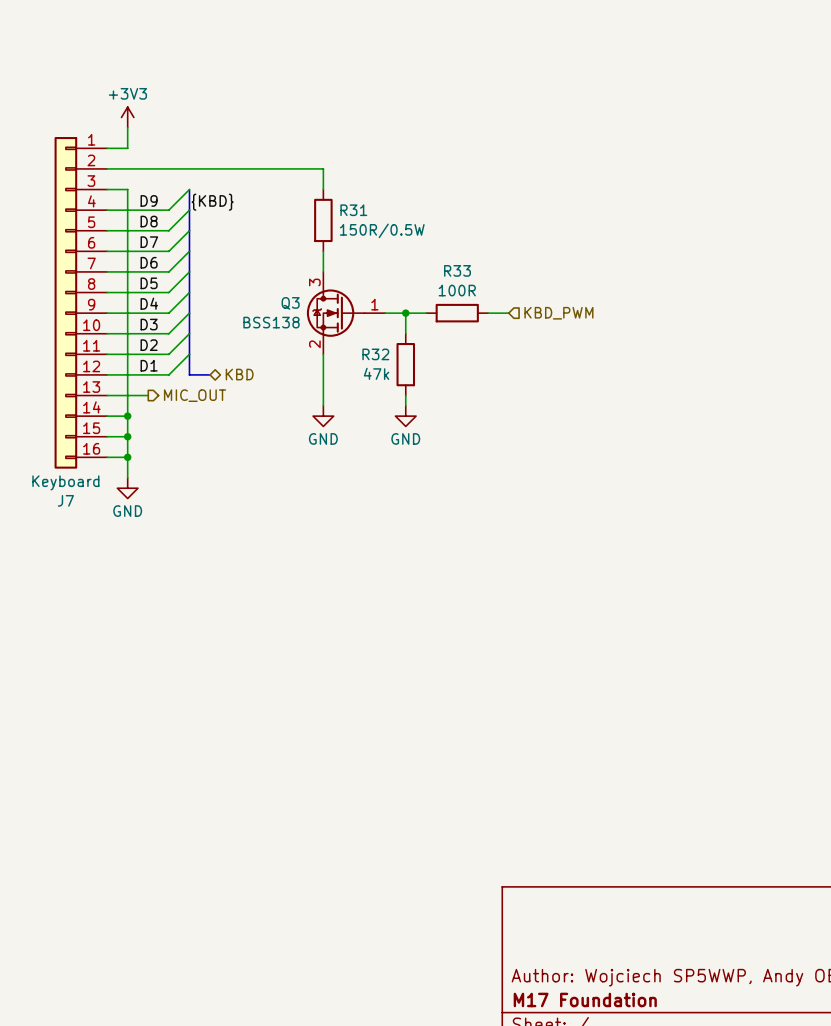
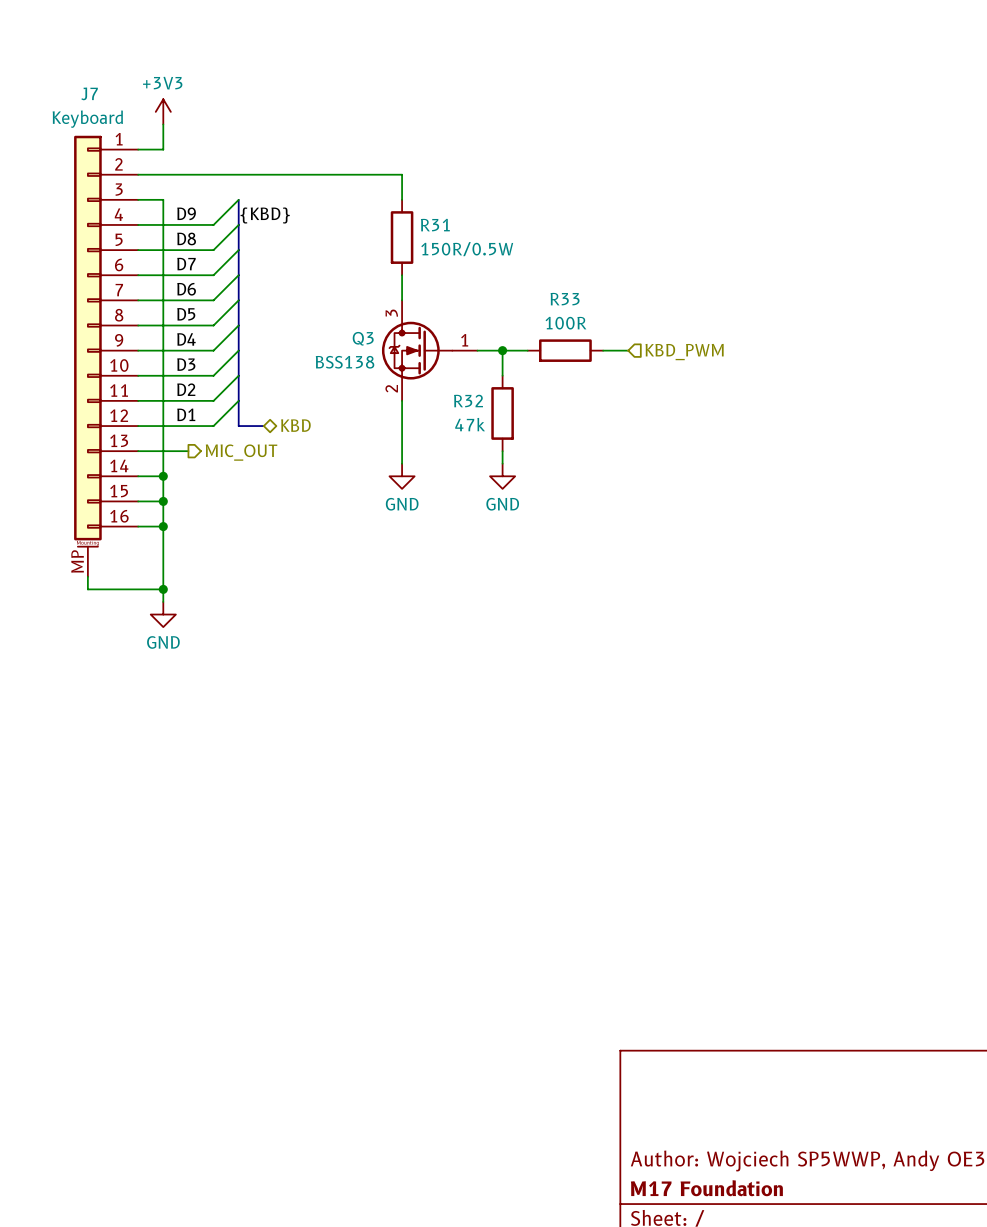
J7 symbol: [54, 137, 108, 469] -> [74, 135, 139, 577]
wire: none -> (163, 551) (163, 601)
J7 value position: Keyboard (65, 482) -> Keyboard (87, 119)
power symbol position: GND (127, 488) -> GND (163, 614)
wire: none -> (87, 576) (87, 589) (163, 589)
J7 name position: J7 (65, 500) -> J7 (89, 93)
junction: none -> (163, 589)

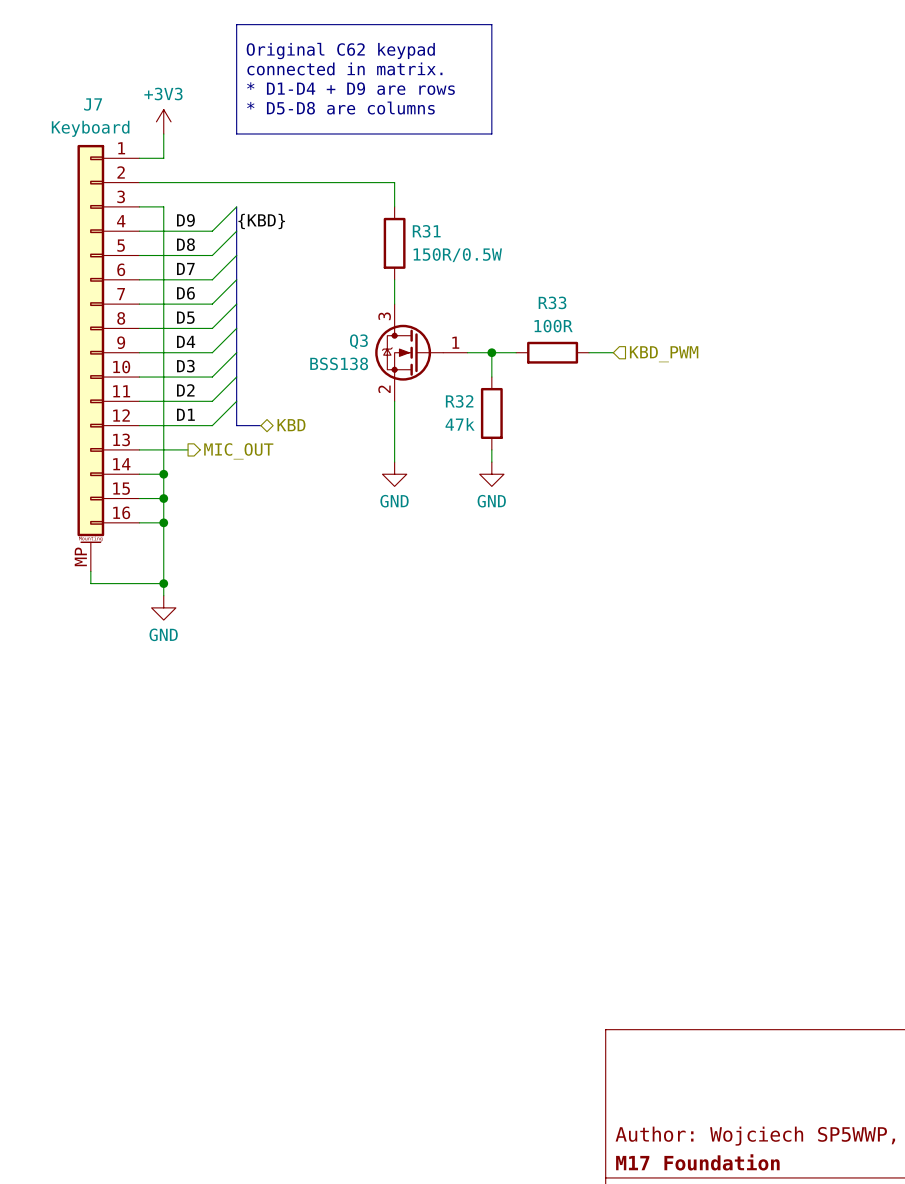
line: none -> (236, 24) (491, 24) (491, 133) (236, 133) (236, 24)
text: none -> Original C62 keypad (340, 51)
text: none -> connected in matrix. (344, 68)
text: none -> * D1-D4 + D9 are rows (350, 88)
text: none -> * D5-D8 are columns (340, 108)

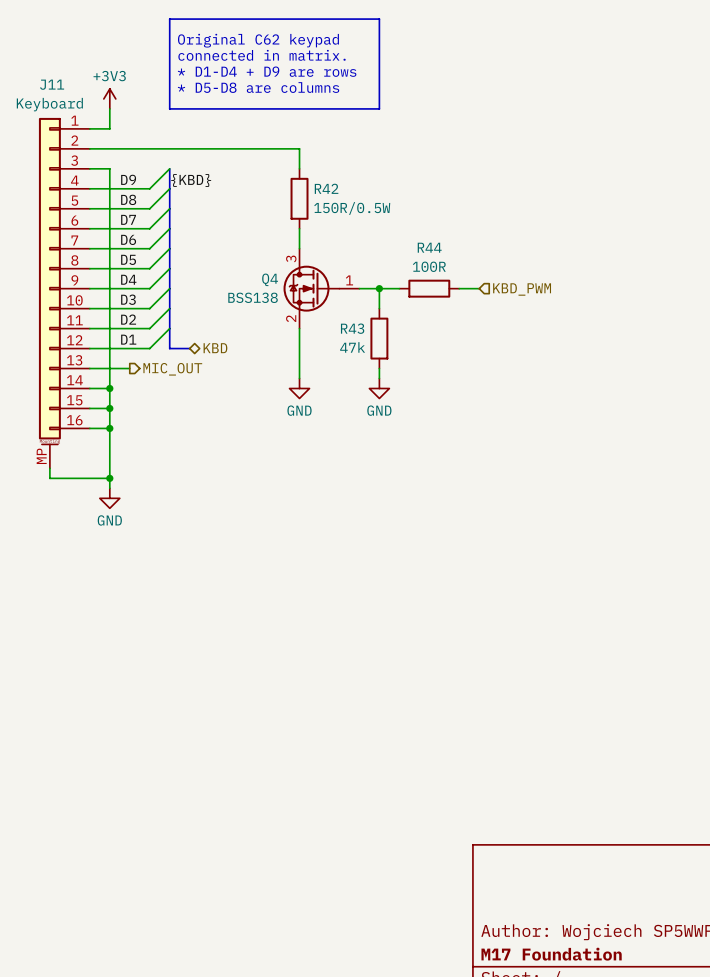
J7 name: J7 (93, 104) -> J11 (52, 84)
R31 name: R31 (426, 231) -> R42 (326, 188)
R33 name: R33 (552, 302) -> R44 (429, 247)
Q3 name: Q3 (358, 341) -> Q4 (270, 279)
R32 name: R32 (459, 401) -> R43 (352, 328)

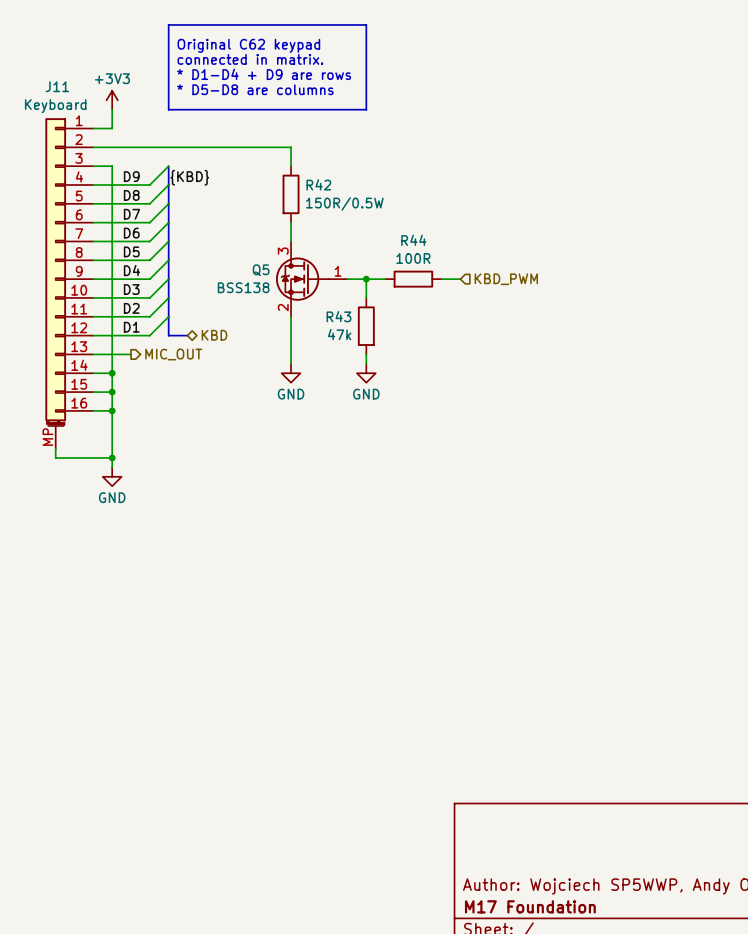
Q4 name: Q4 (270, 279) -> Q5 (261, 270)

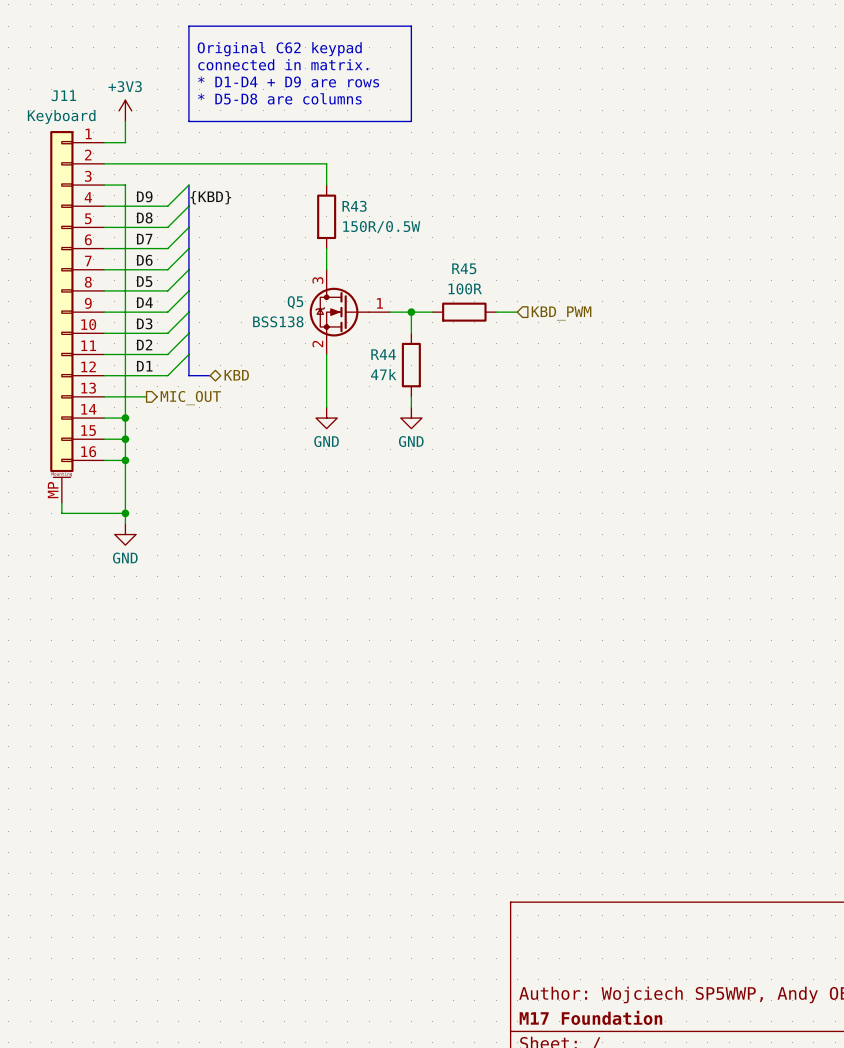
R42 name: R42 (318, 184) -> R43 (354, 206)
R44 name: R44 (413, 240) -> R45 (464, 268)
R43 name: R43 (338, 316) -> R44 (383, 354)

